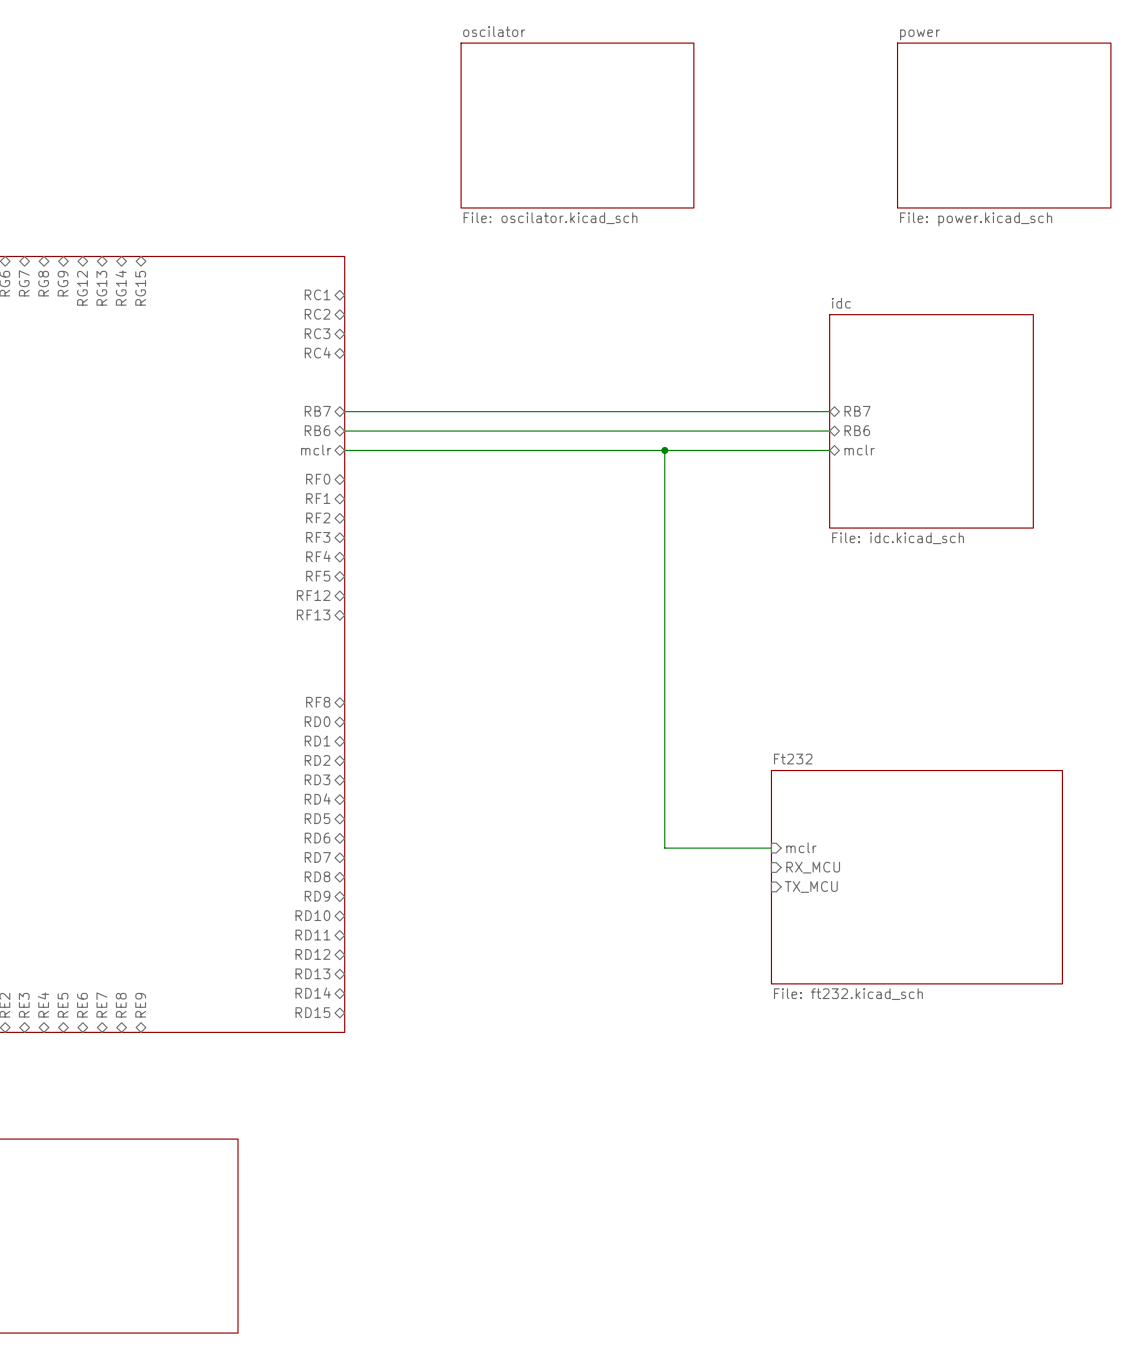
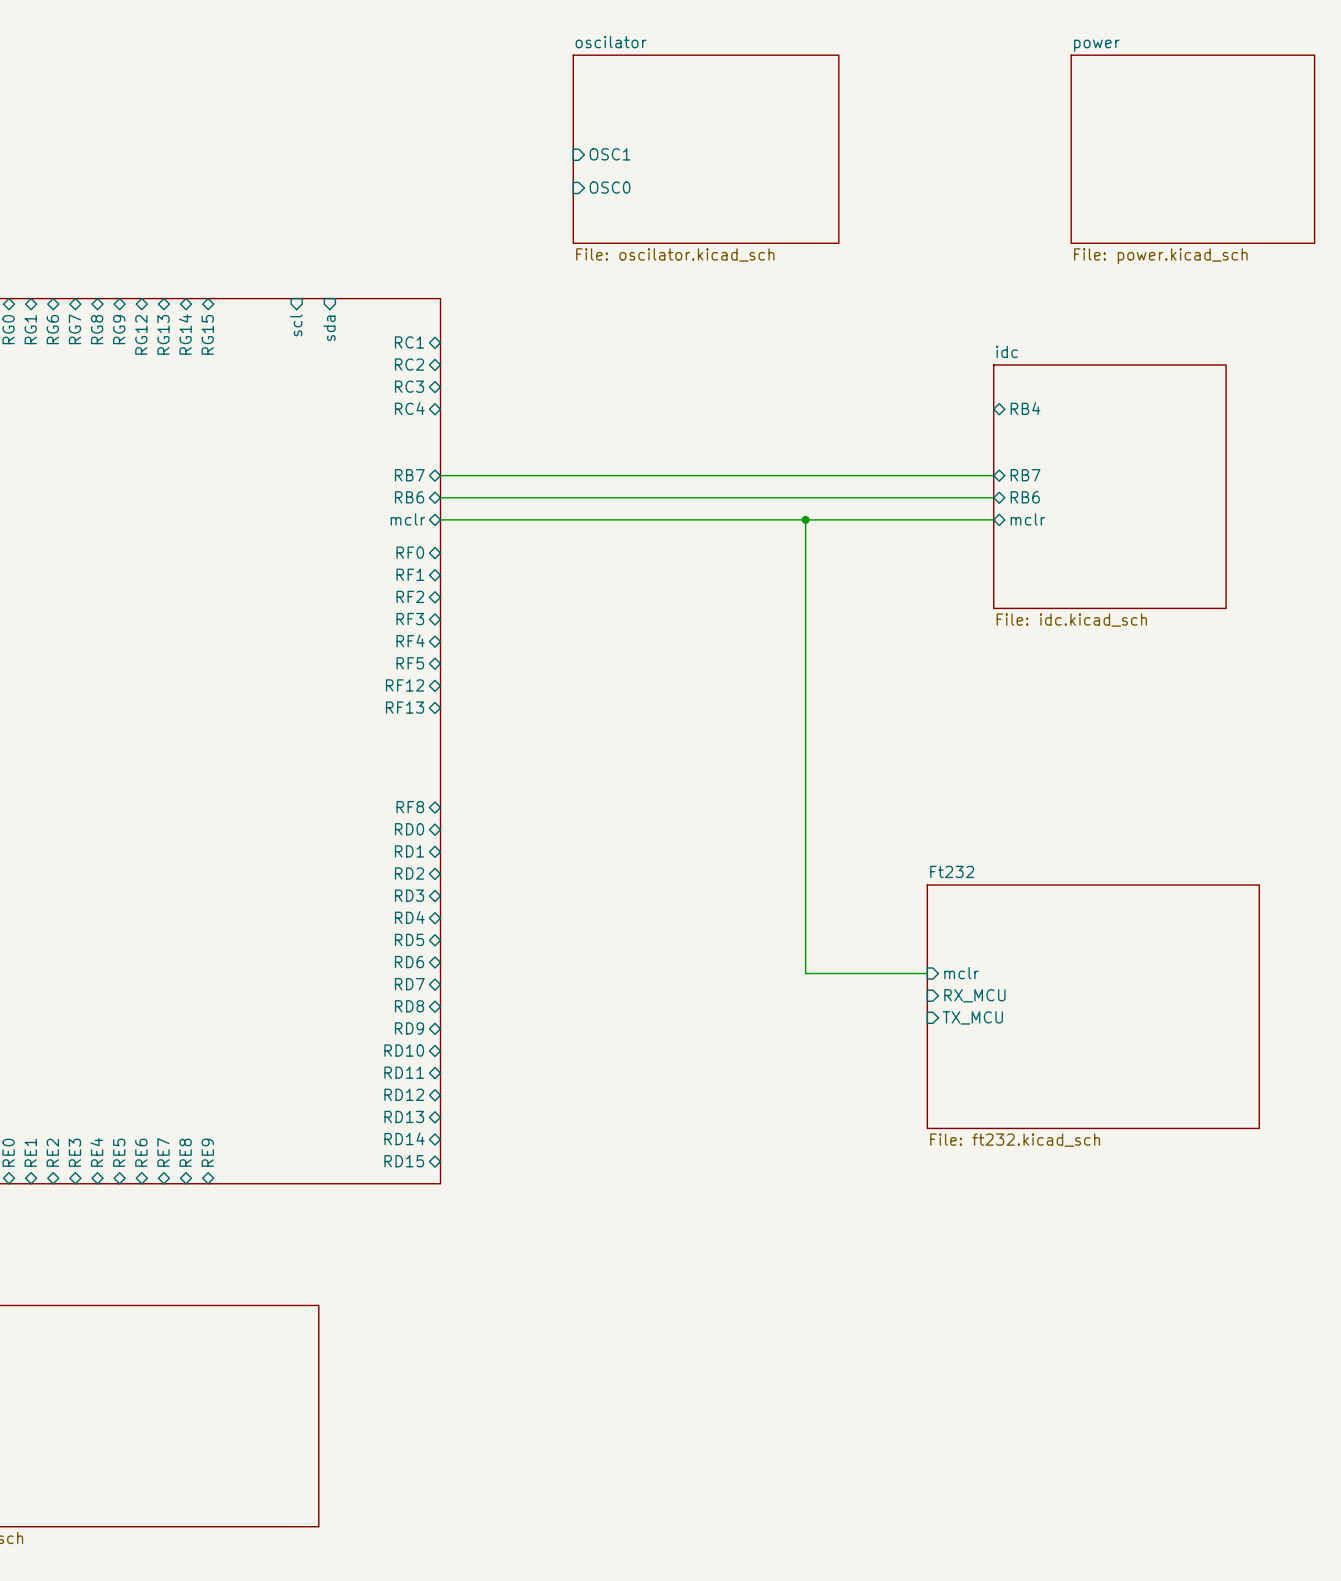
sheet pin: none -> OSC1 (610, 154)
sheet pin: none -> OSC0 (610, 187)
sheet pin: none -> scl (296, 325)
sheet pin: none -> sda (329, 328)
sheet pin: none -> RB4 (1025, 408)

